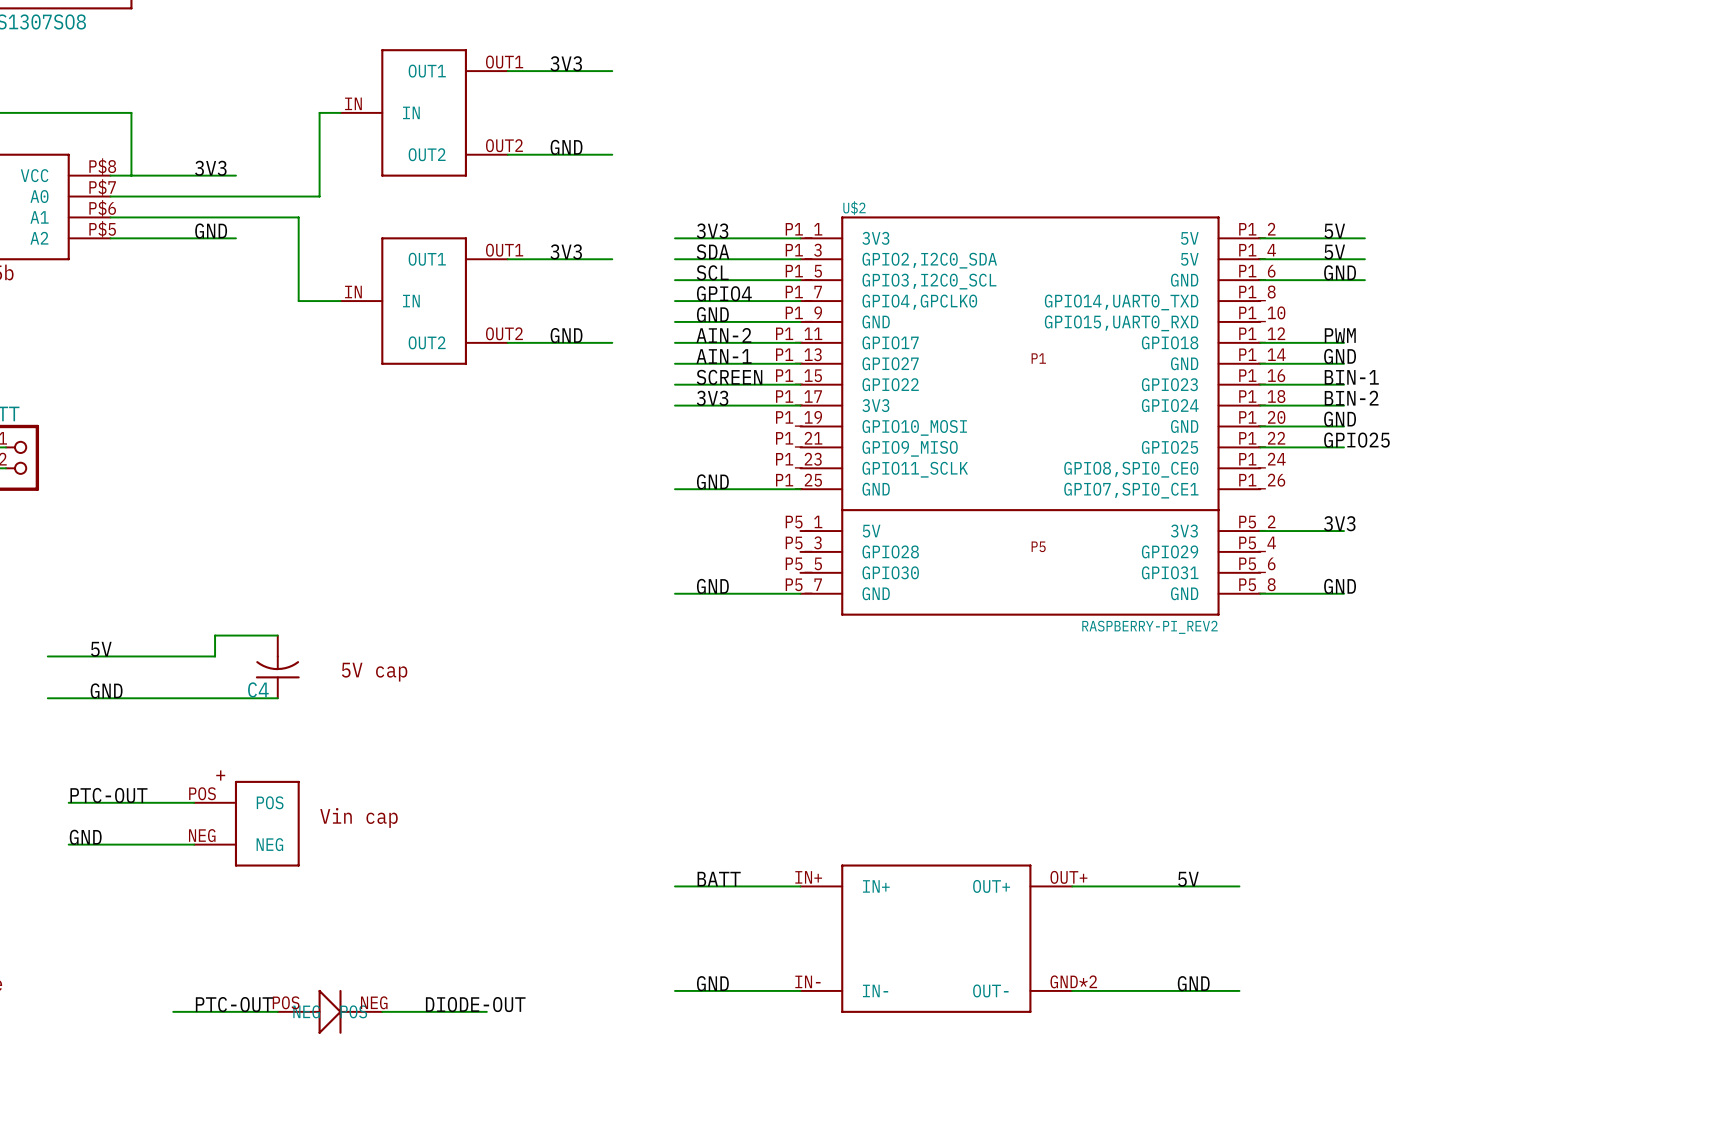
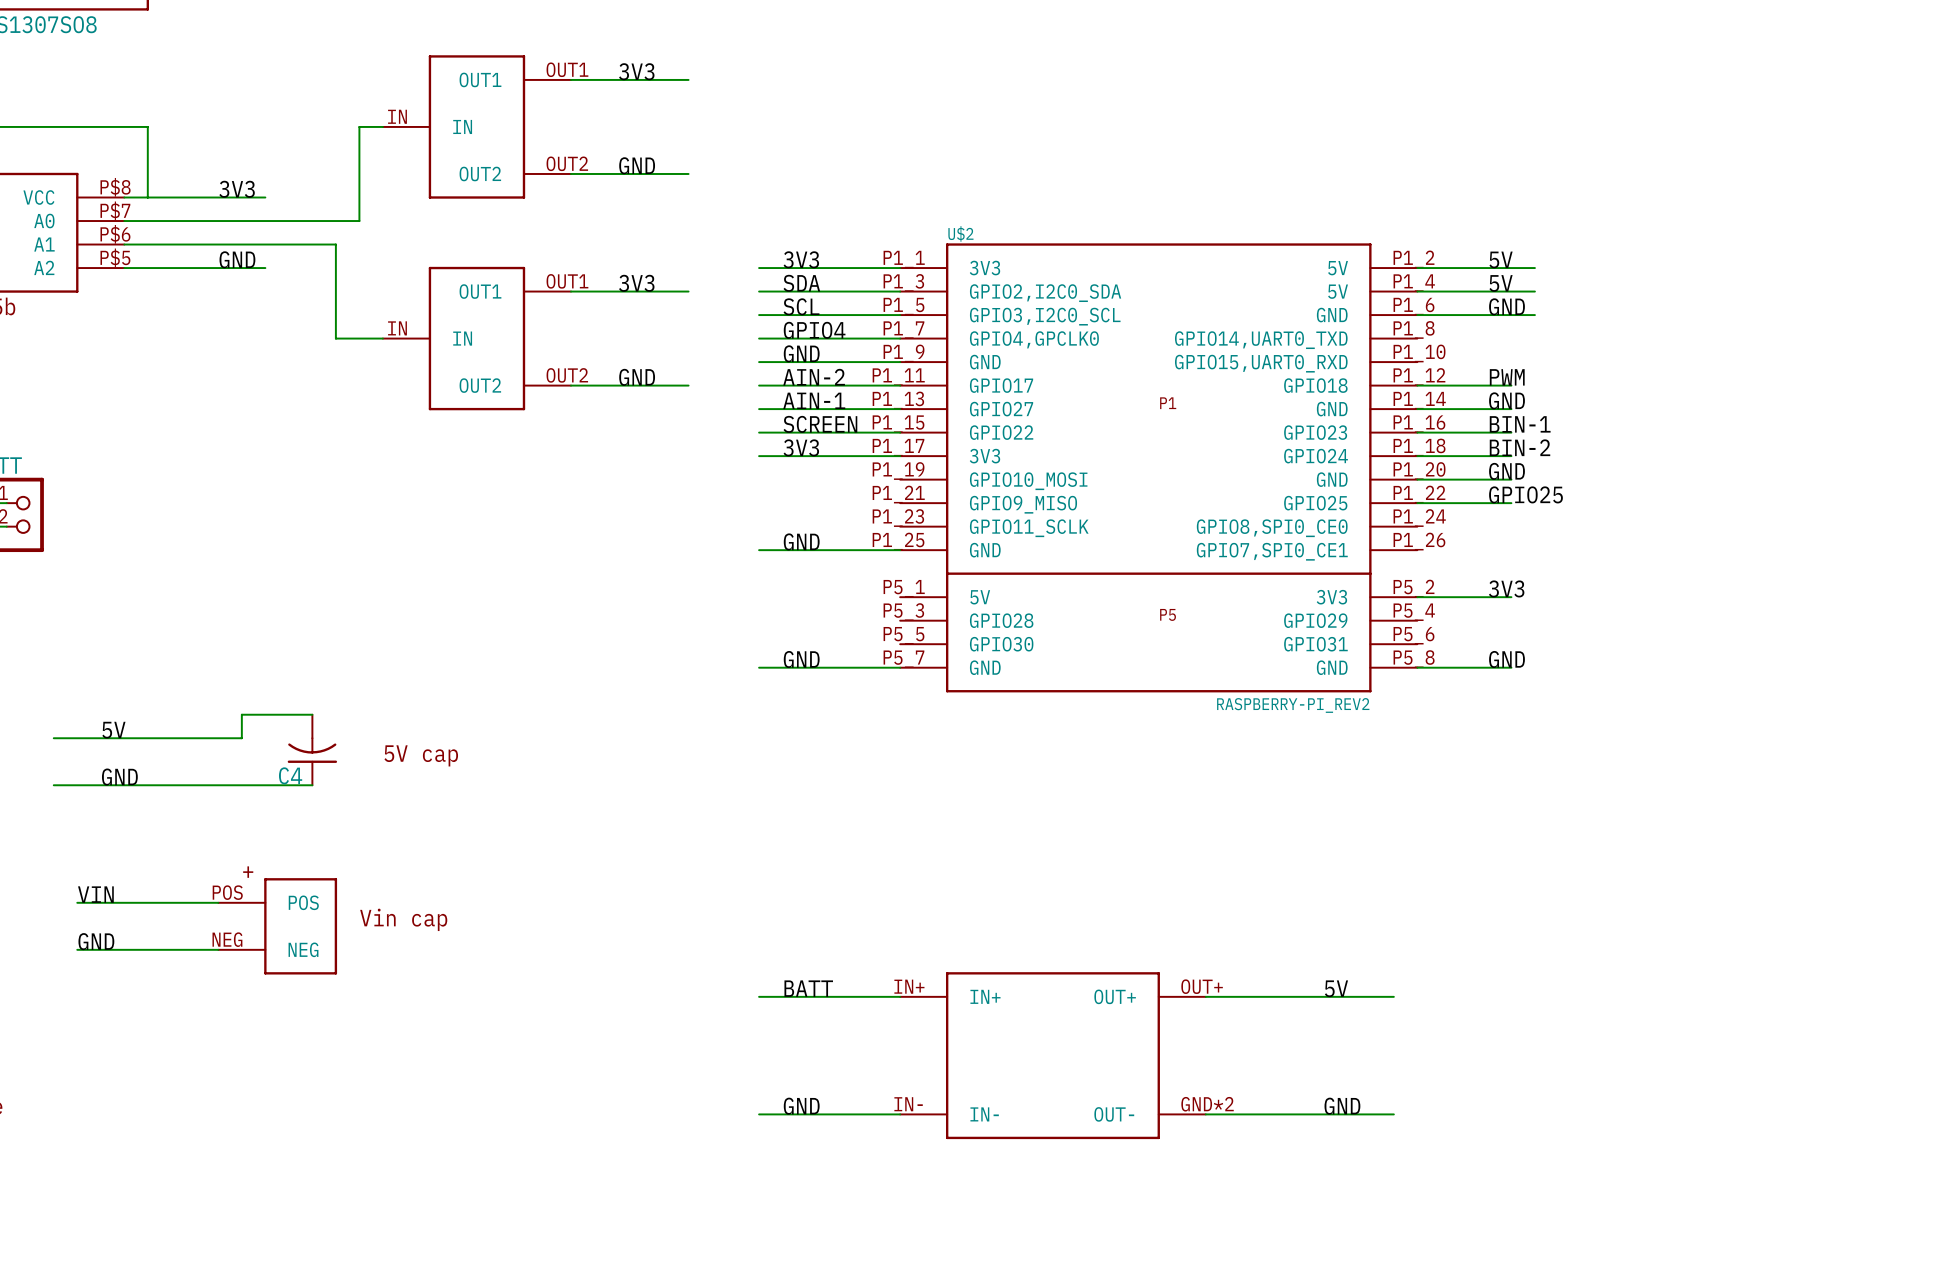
label: PTC-OUT (108, 795) -> VIN (95, 894)
label: PTC-OUT (234, 1004) -> none
label: DIODE-OUT (475, 1004) -> none
wire: (173, 1011) (277, 1011) -> none
part: (330, 1011) -> none
wire: (382, 1011) (486, 1011) -> none

